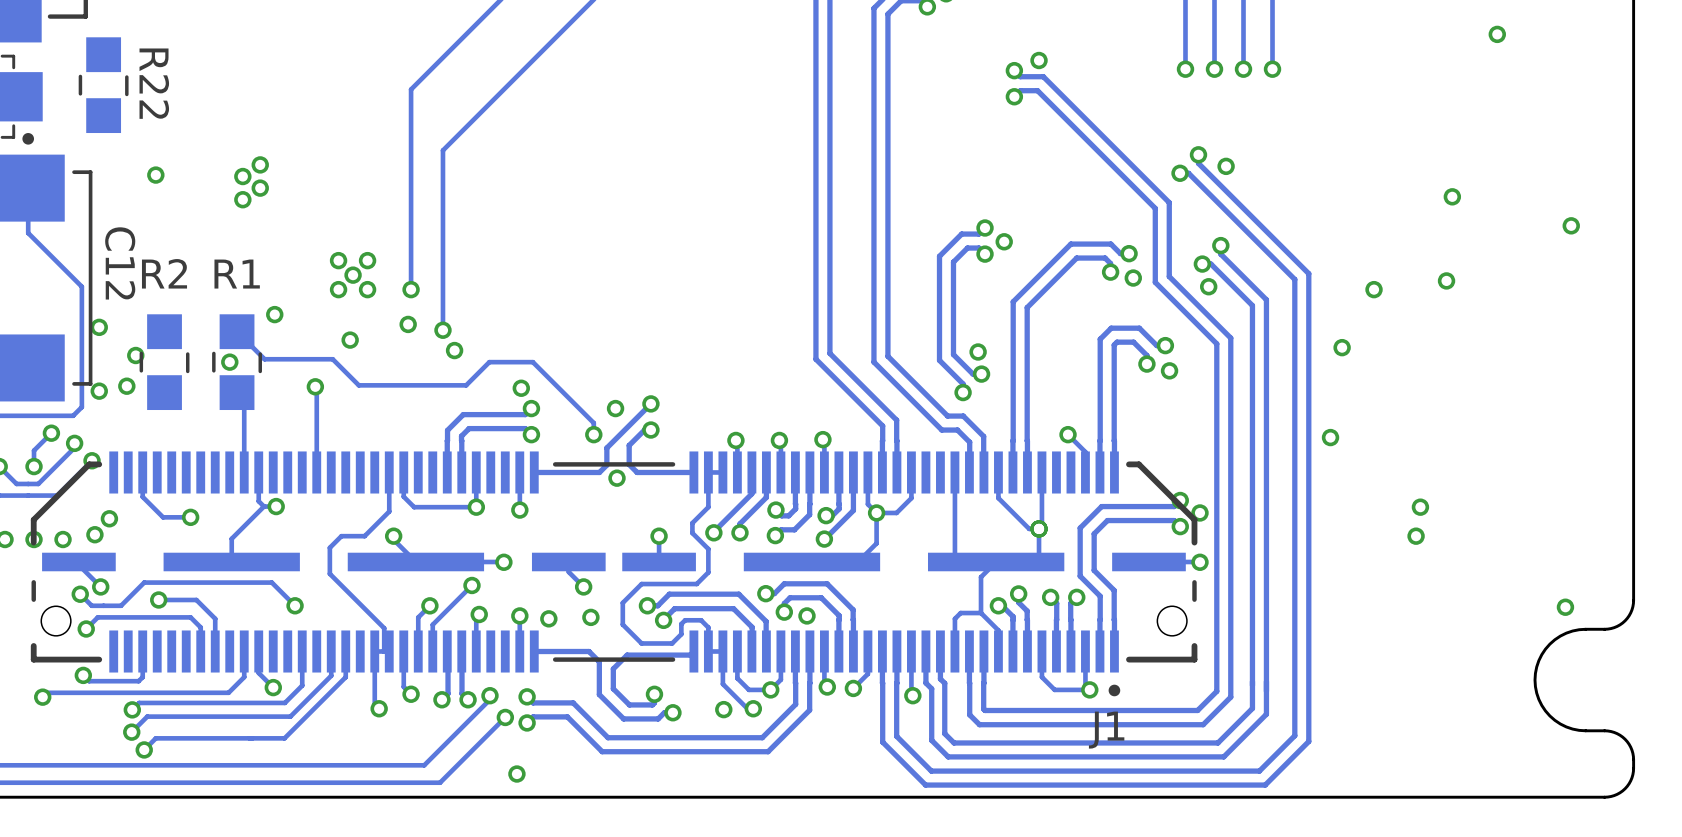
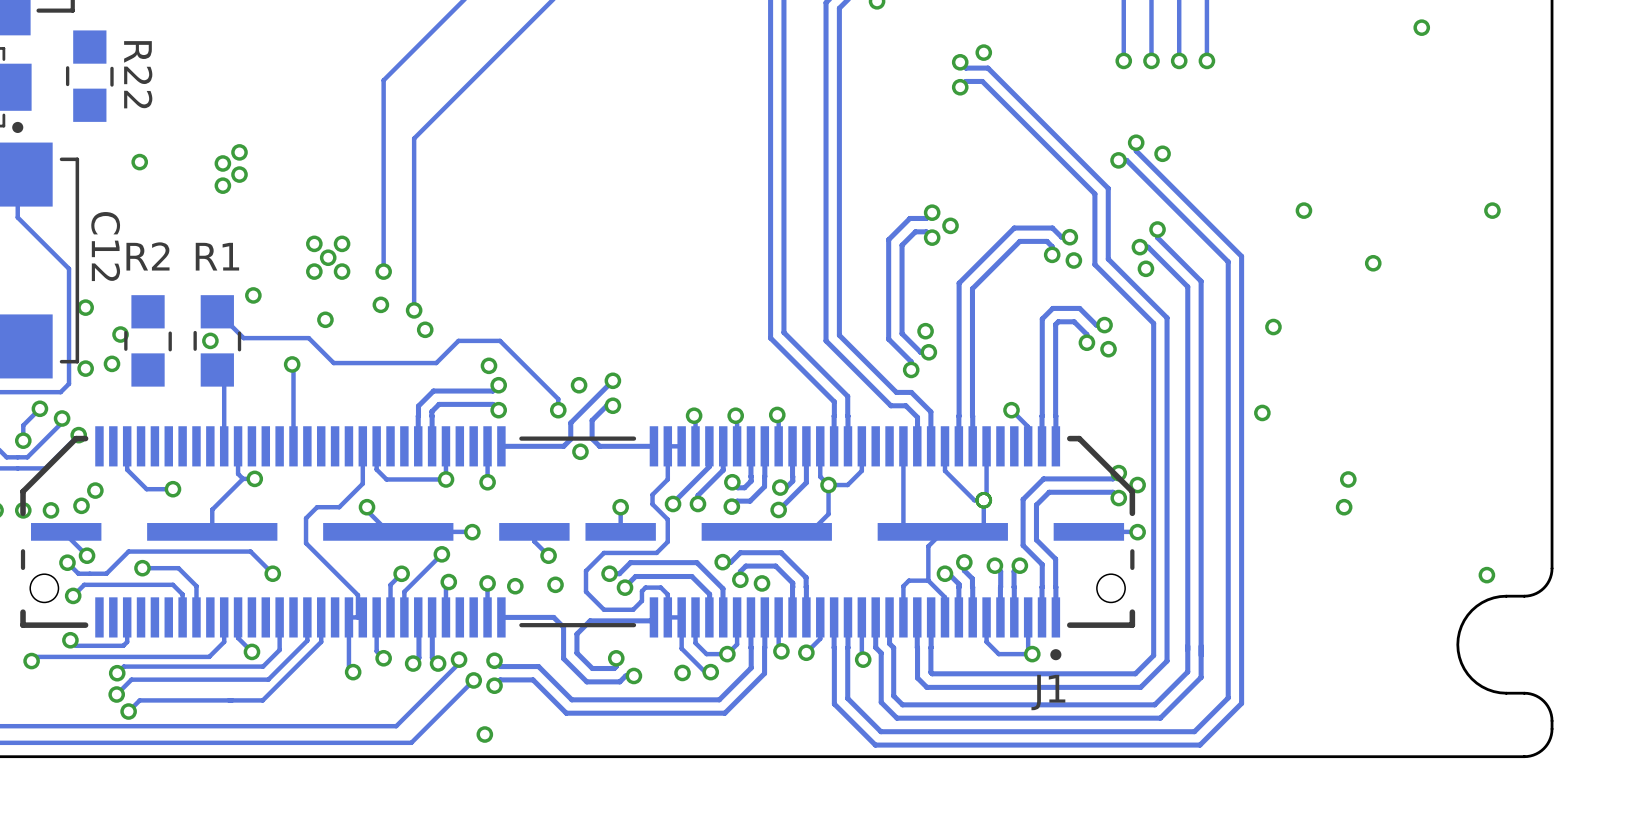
via: (1452, 196) -> none
via: none -> (1303, 210)
via: (1374, 289) -> none

